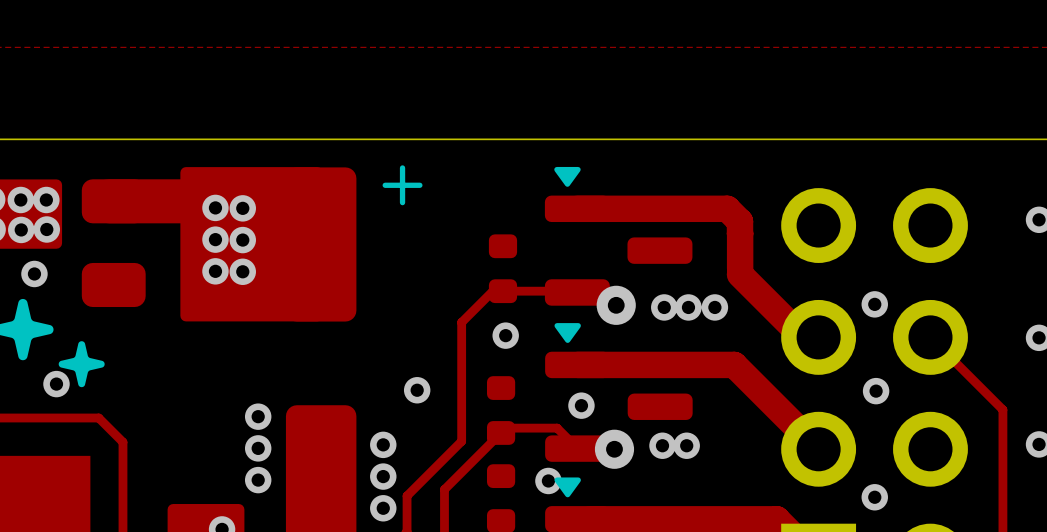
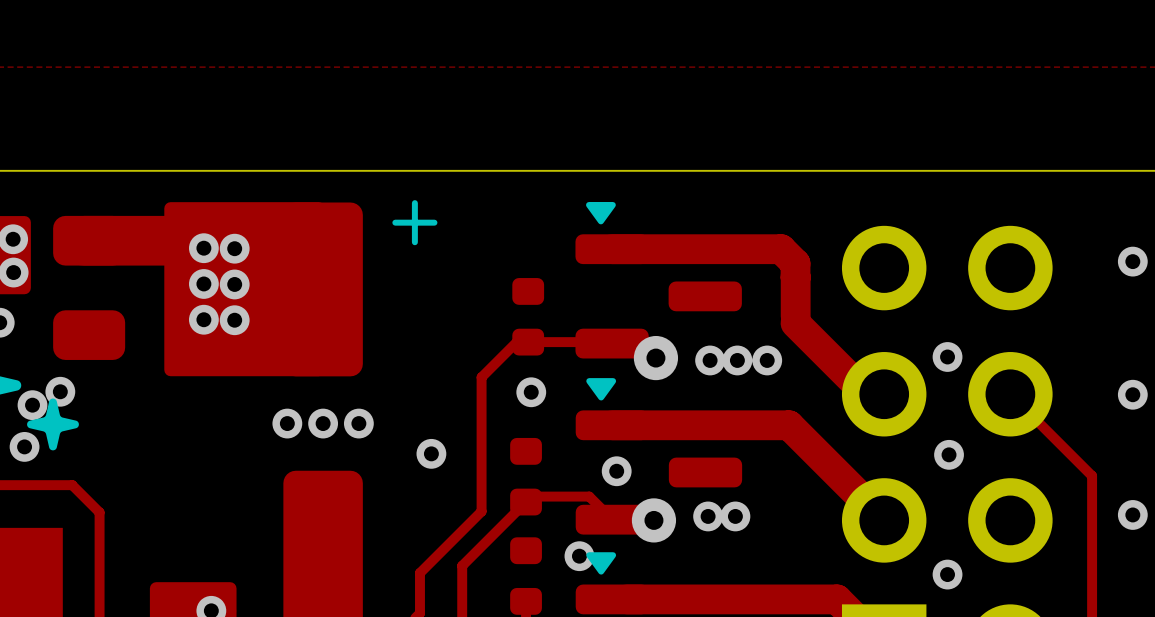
via: none -> (60, 391)
via: none -> (32, 405)
via: none -> (287, 423)
via: none -> (323, 423)
via: none -> (358, 423)
via: (258, 416) -> none
via: (383, 444) -> none
via: (258, 448) -> none
via: (383, 476) -> none
via: (258, 480) -> none
via: (383, 508) -> none

